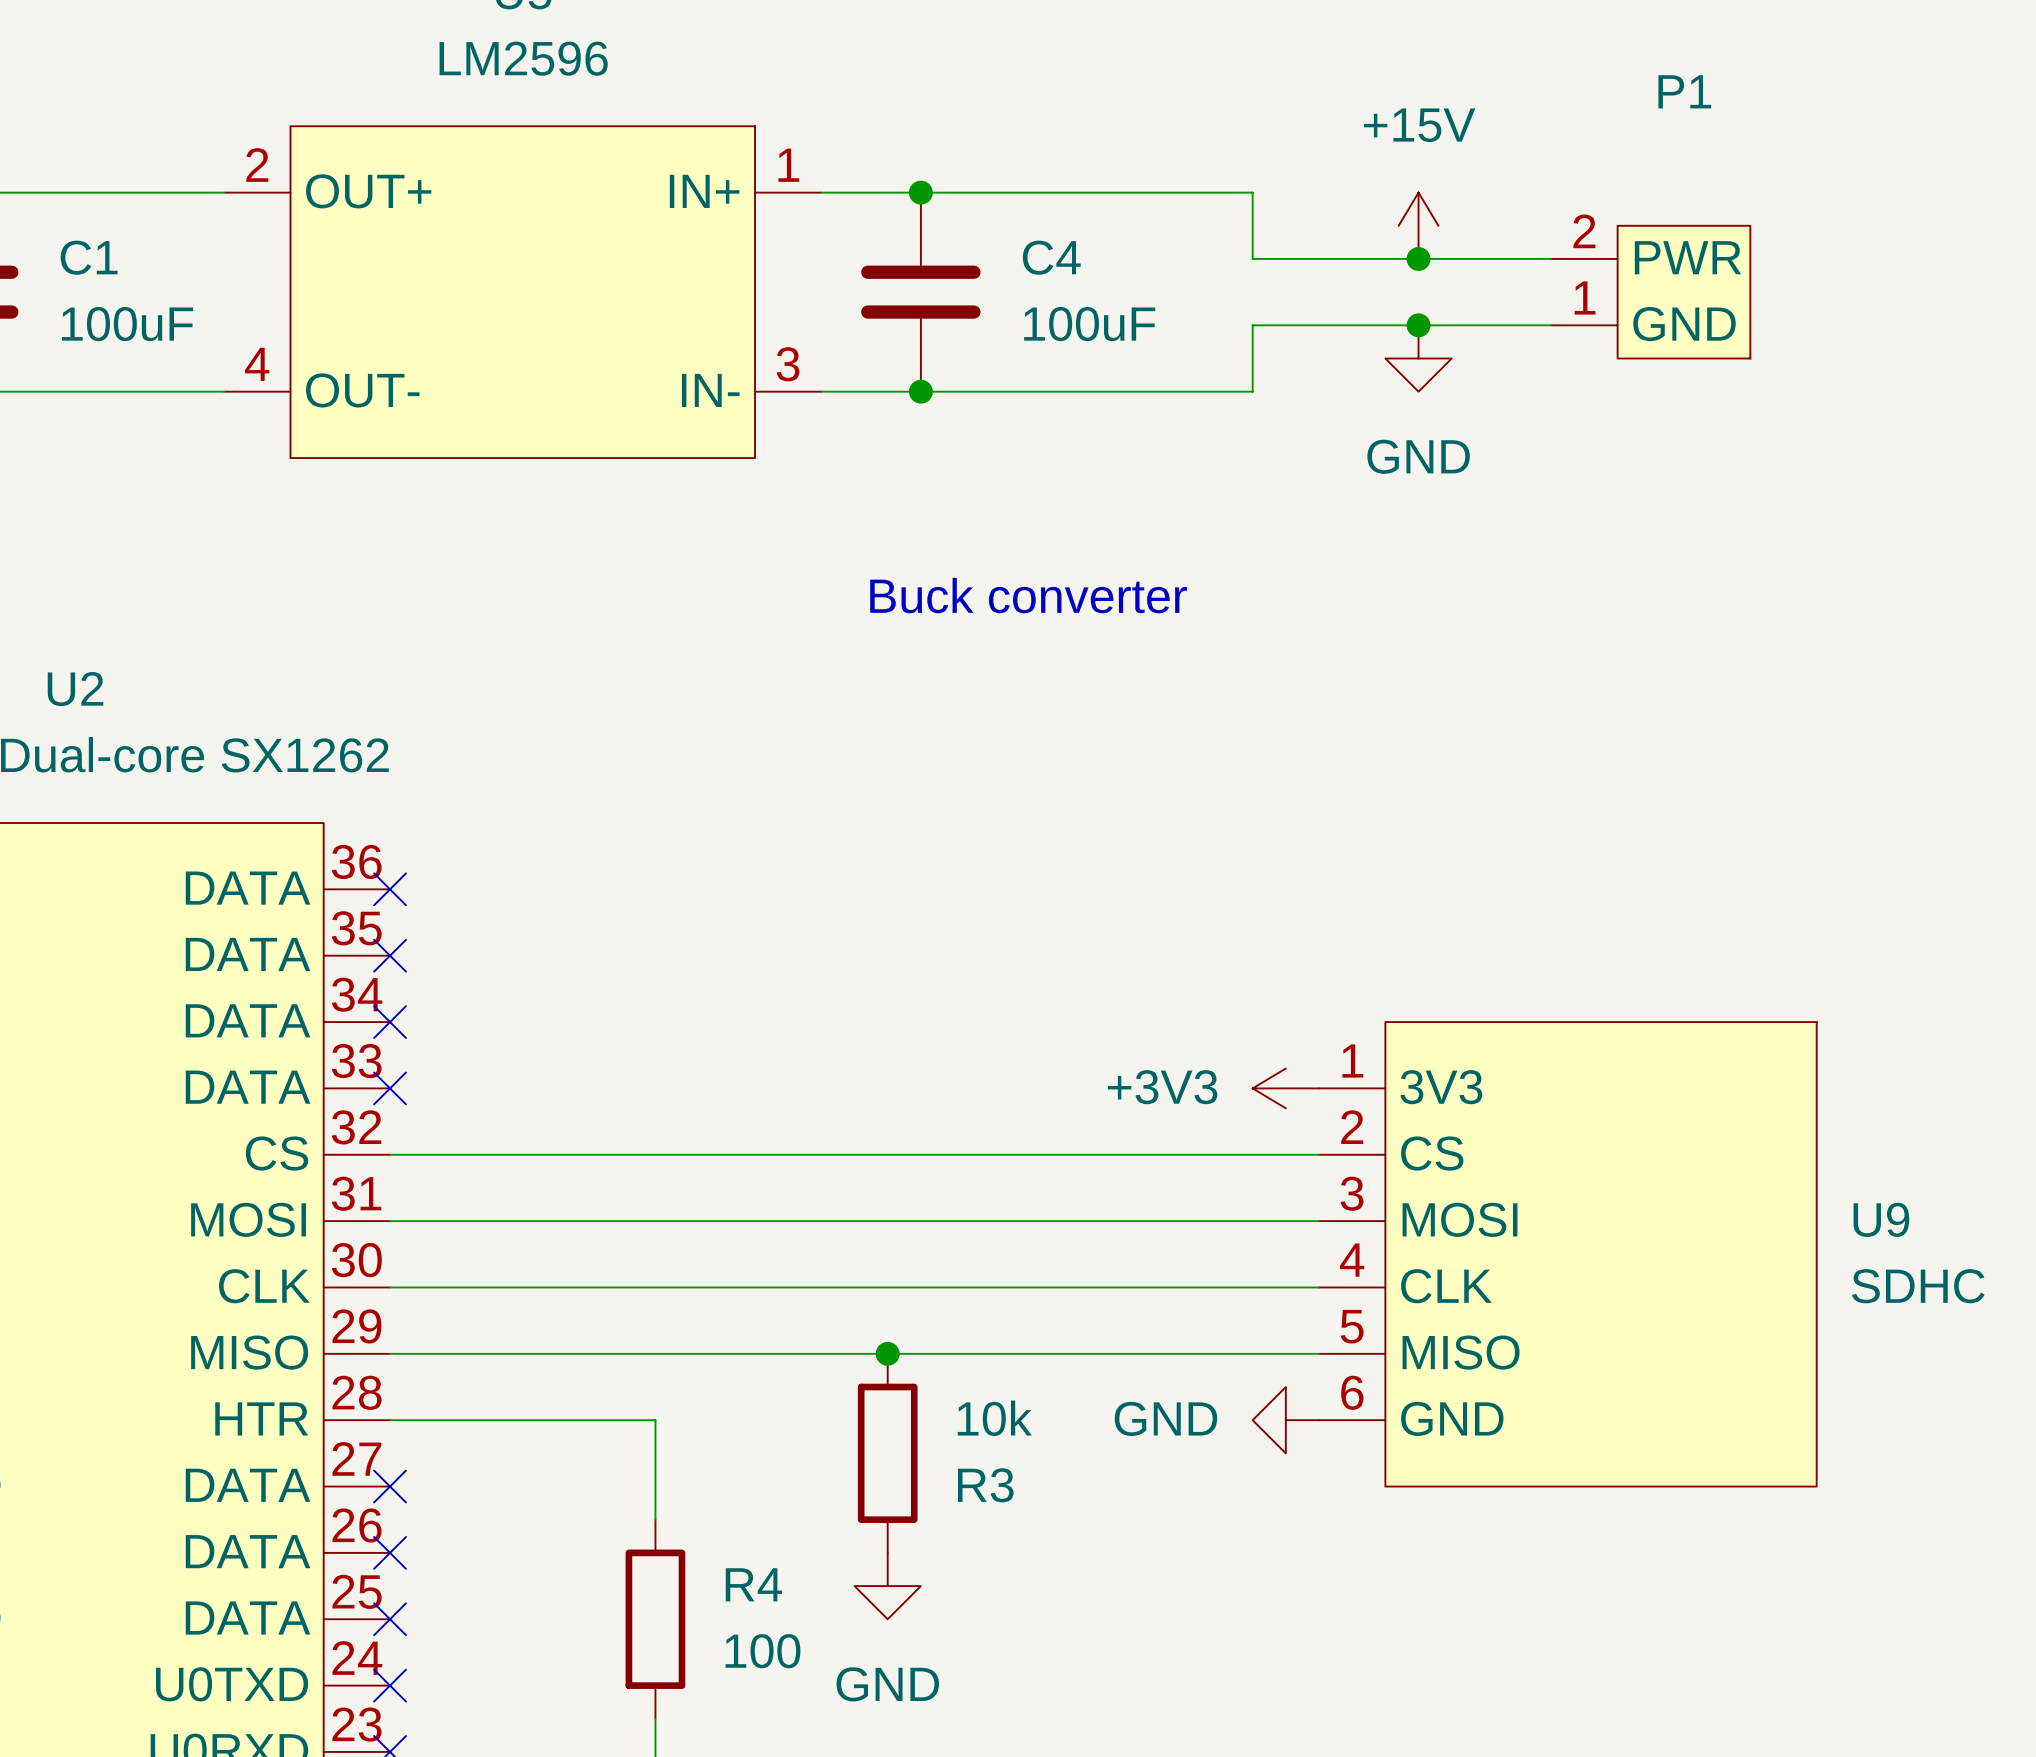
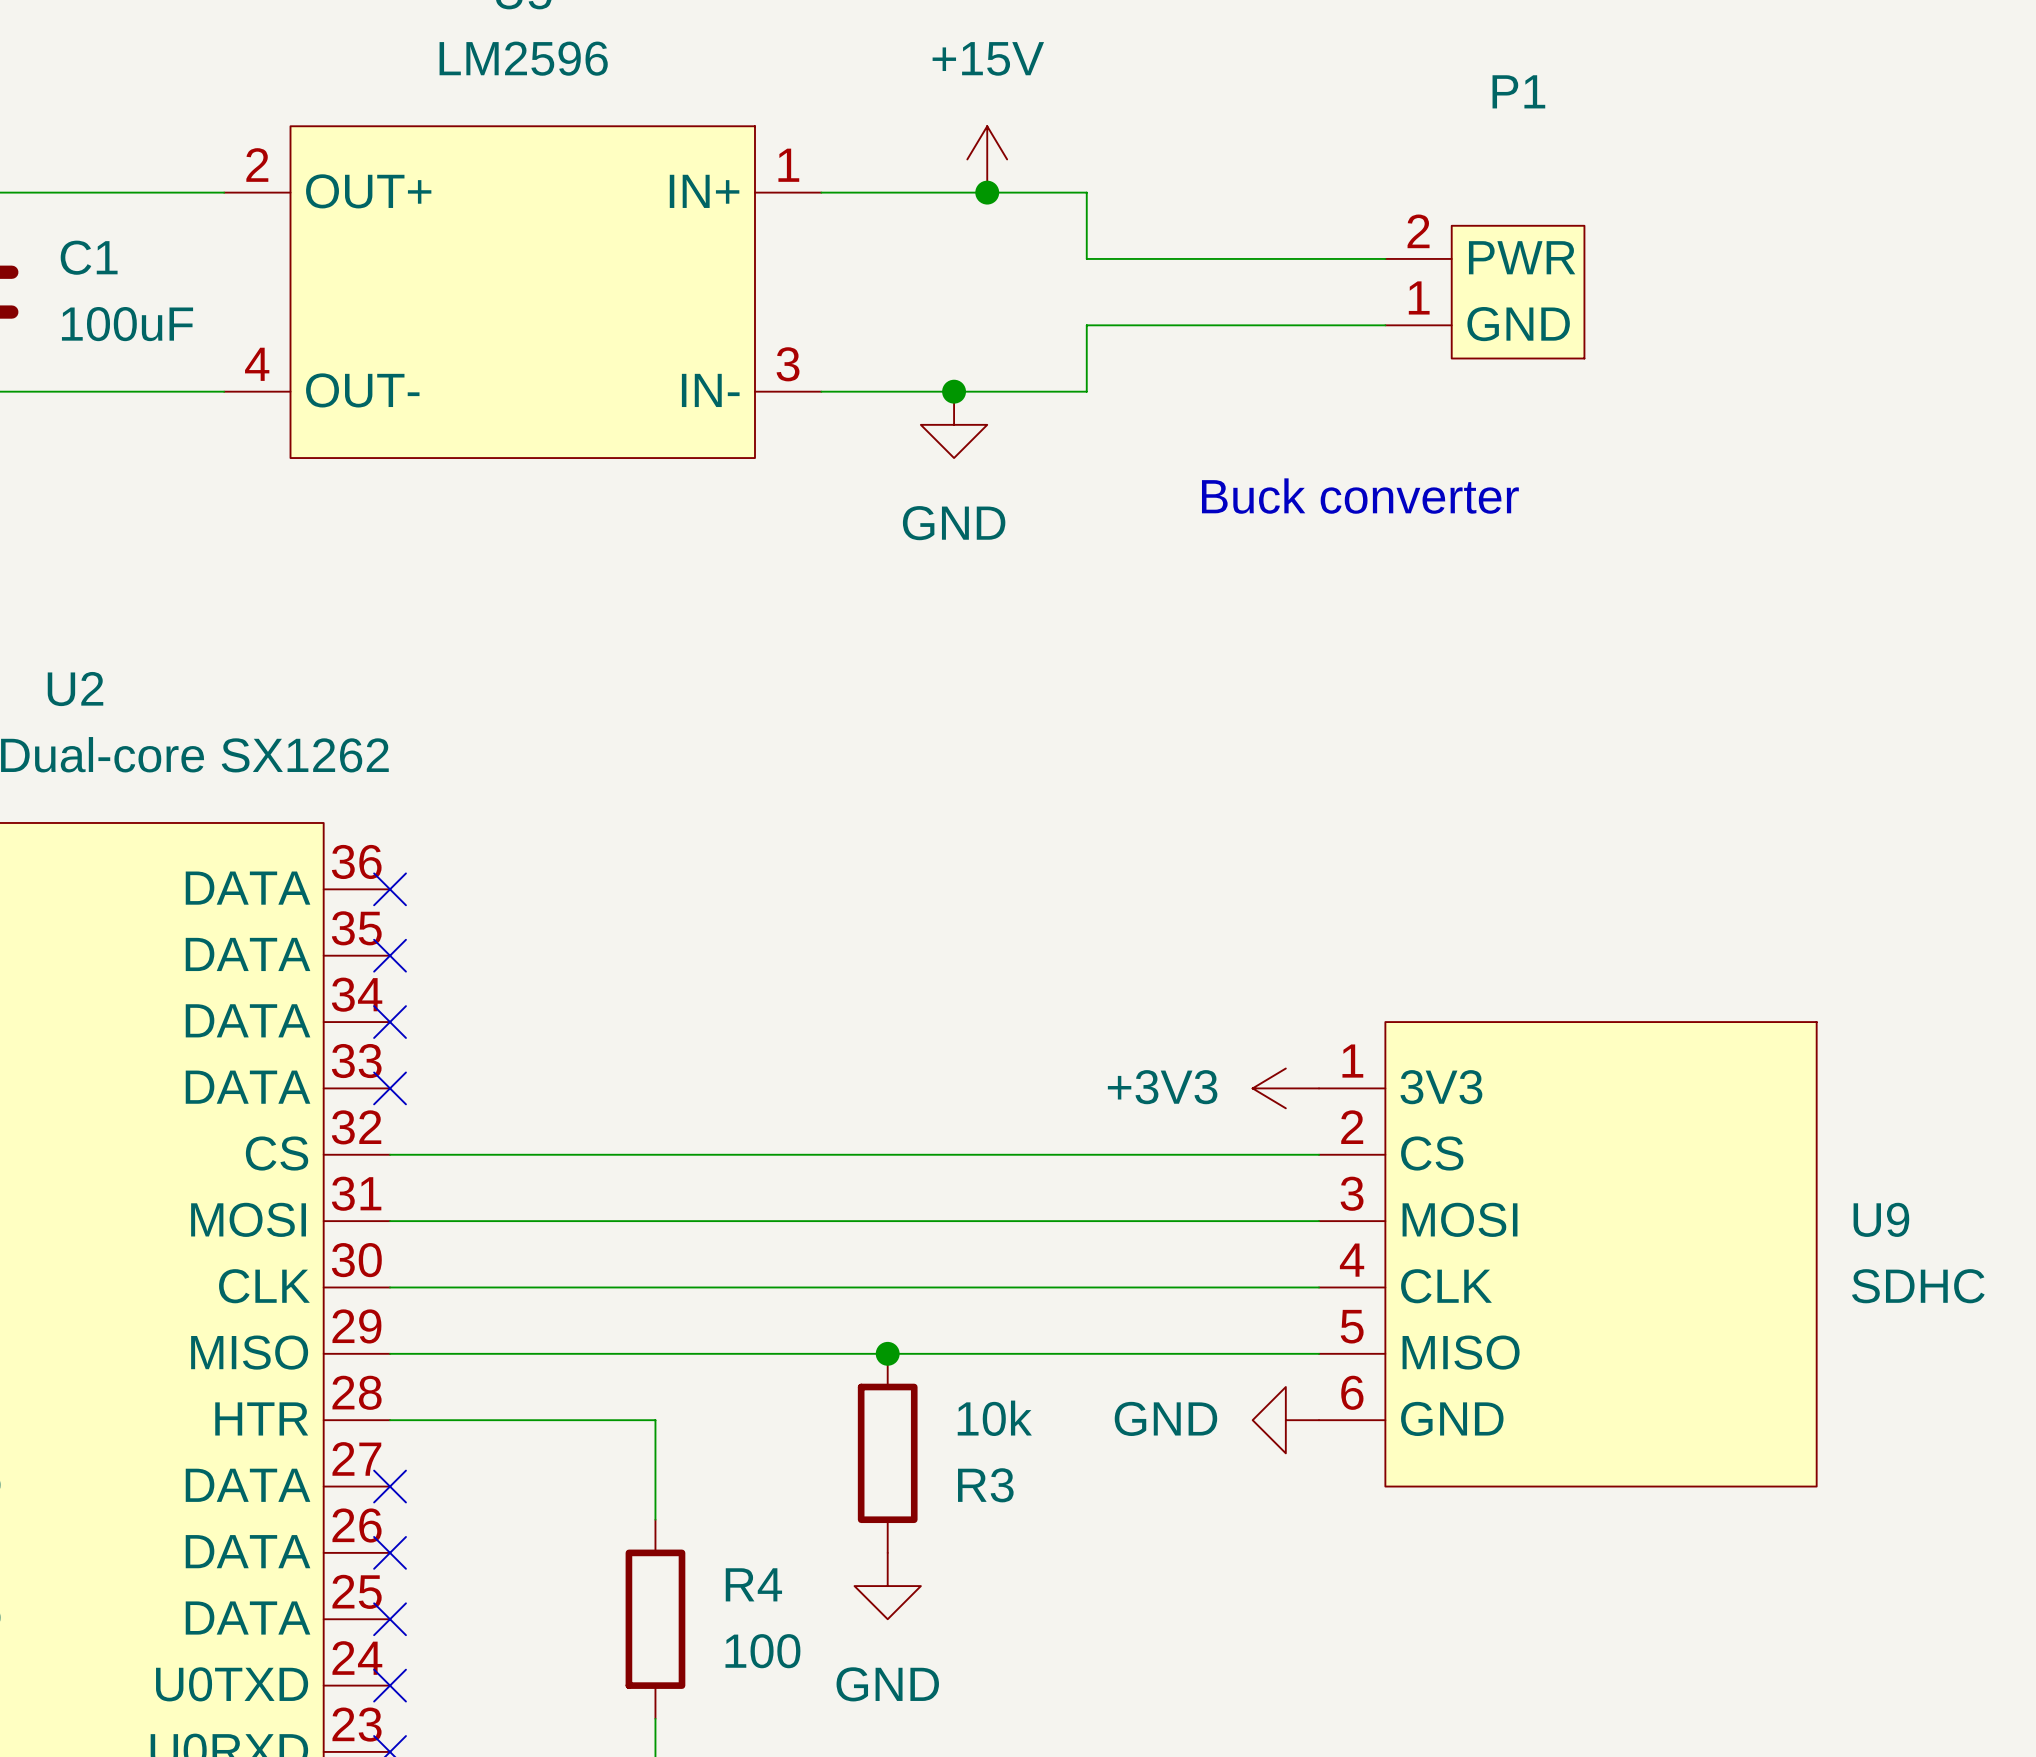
junction position: (920, 192) -> (987, 192)
wire: (1086, 192) (1252, 192) (1252, 258) -> (1086, 192) (1086, 258) (1252, 258)
power symbol position: +15V (1418, 225) -> +15V (987, 159)
junction: (1418, 258) -> none
C4: 100uF (920, 292) -> none
P1 position: (1650, 292) -> (1484, 292)
wire: (1252, 325) (1252, 391) (1086, 391) -> (1252, 325) (1086, 325) (1086, 391)
junction: (1418, 325) -> none
power symbol position: GND (1418, 358) -> GND (954, 424)
junction position: (920, 391) -> (954, 391)
text position: Buck converter (1028, 595) -> Buck converter (1360, 496)

